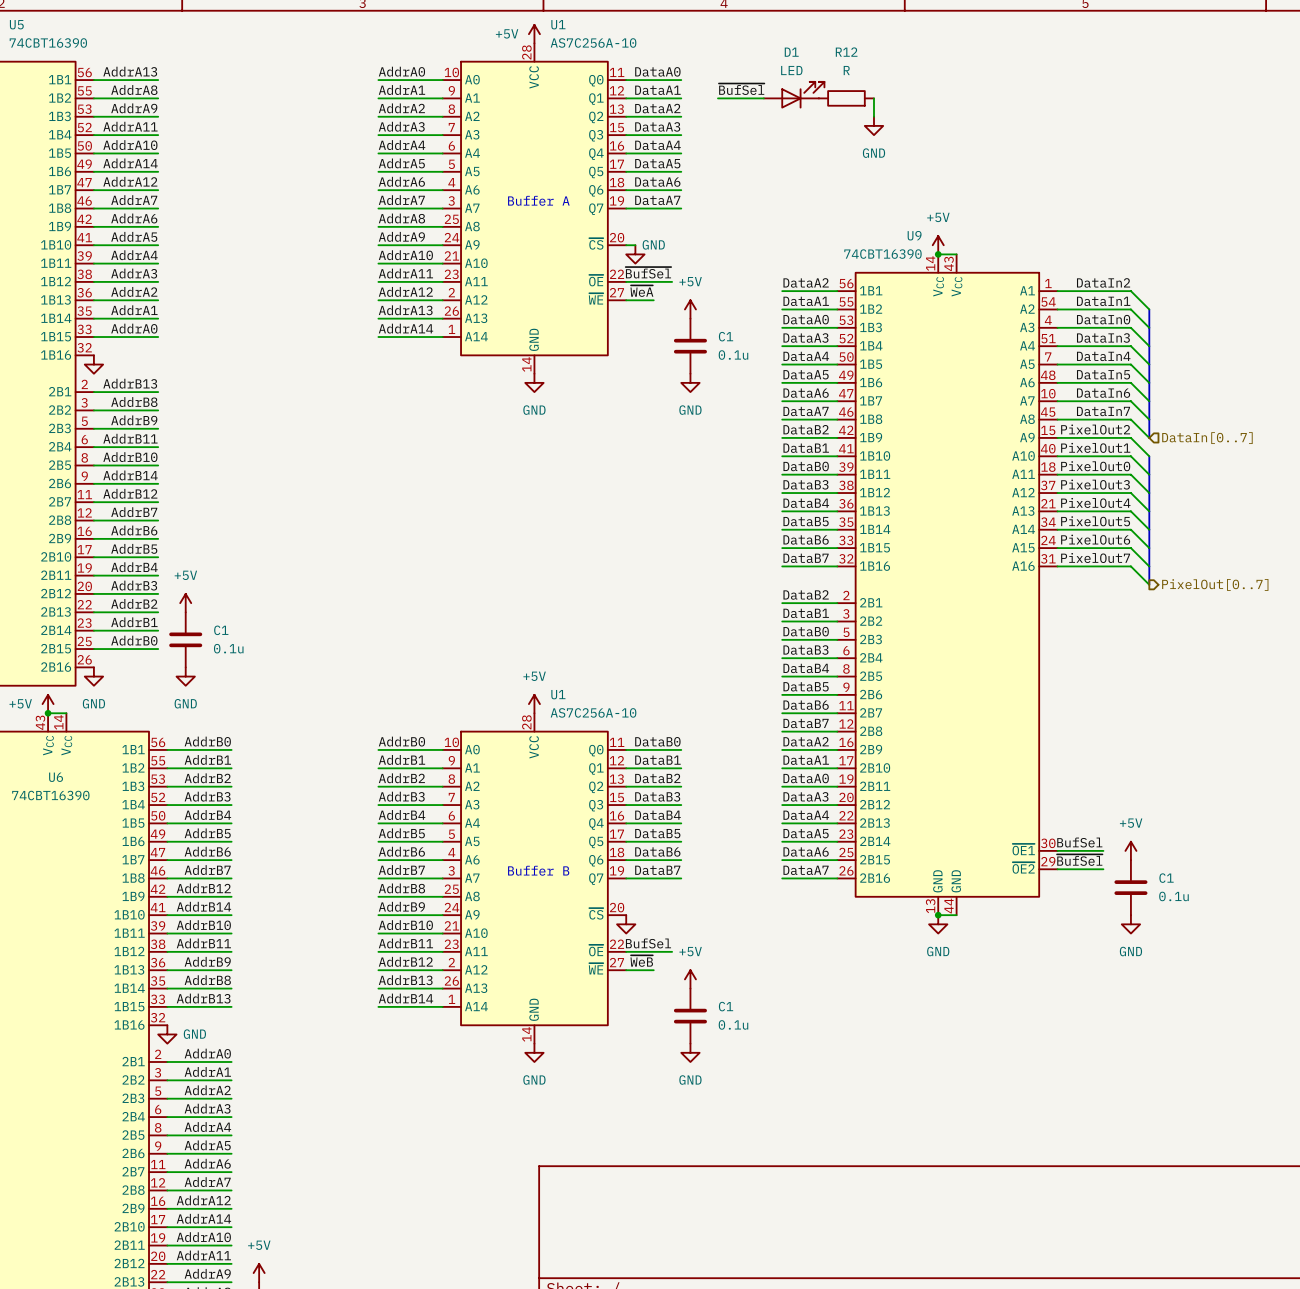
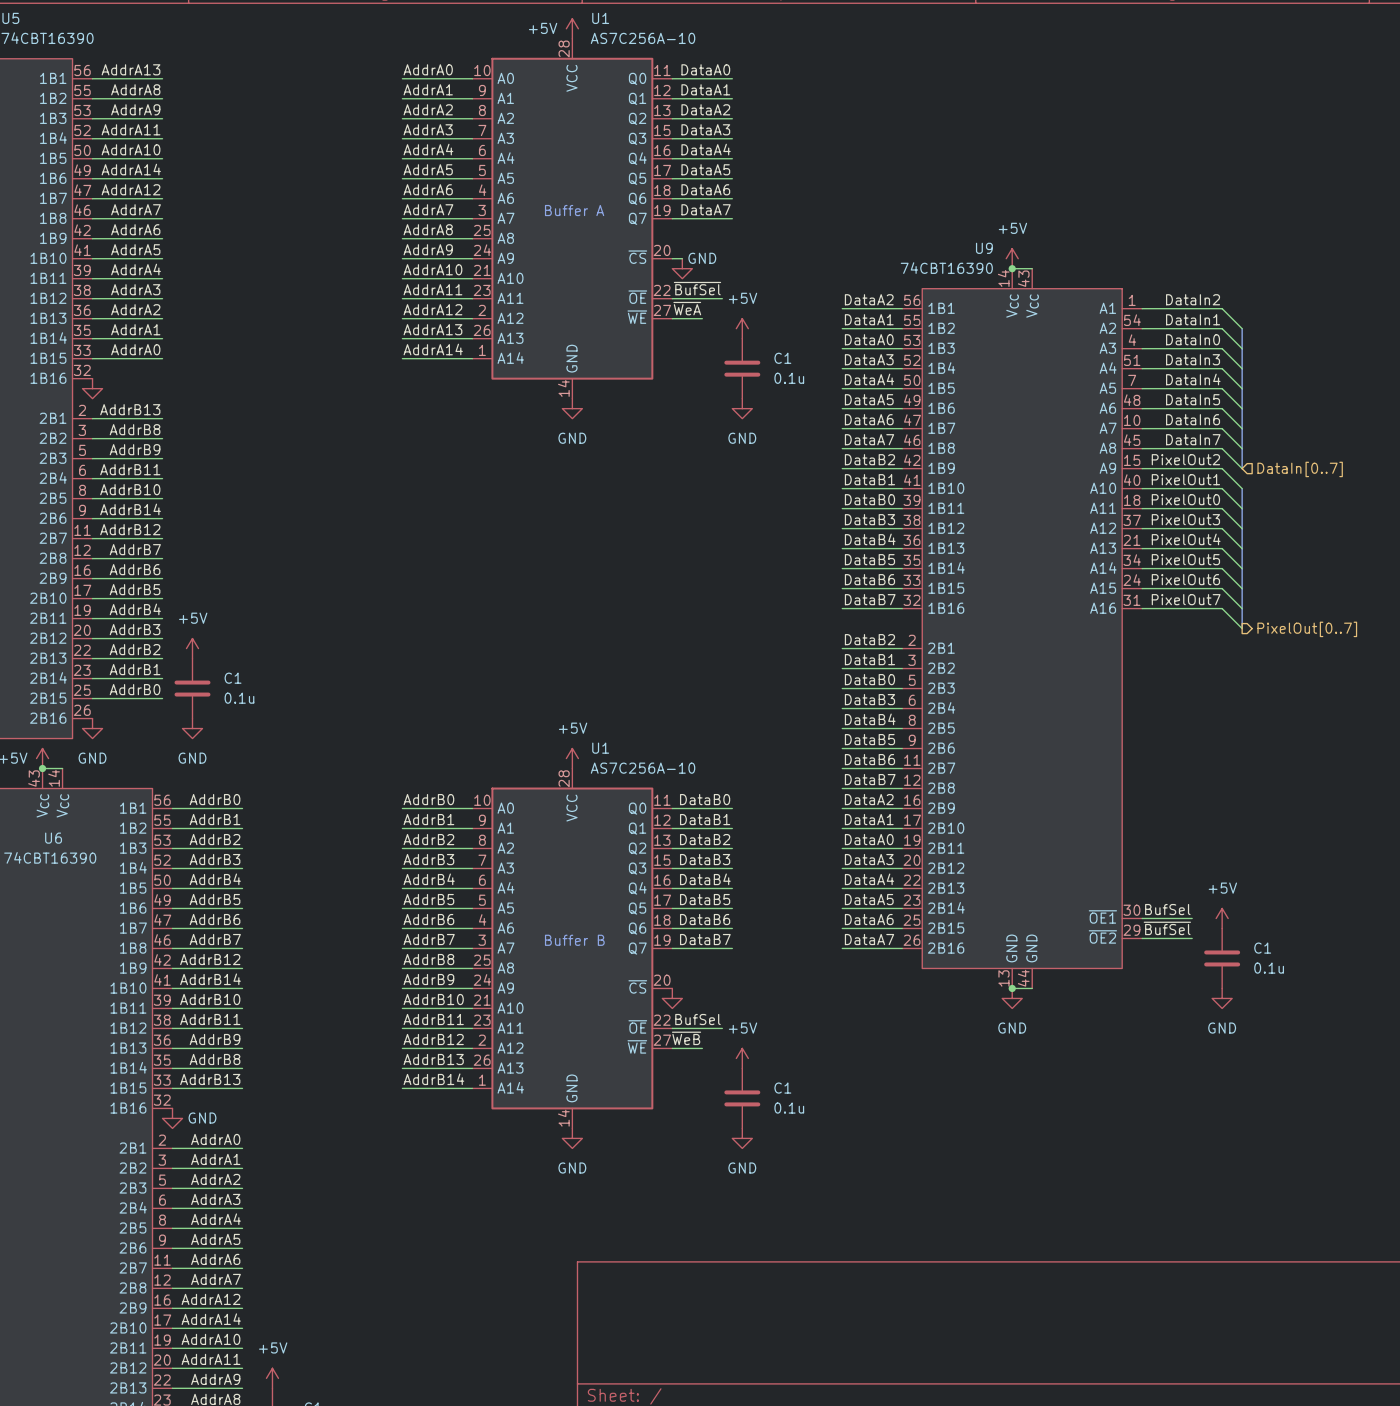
label: ~{BufSel} (741, 89) -> none
D1: LED (794, 95) -> none
wire: (717, 98) (763, 98) -> none
R12: R (846, 98) -> none
wire: (873, 98) (873, 116) -> none
power symbol: GND (873, 125) -> none

